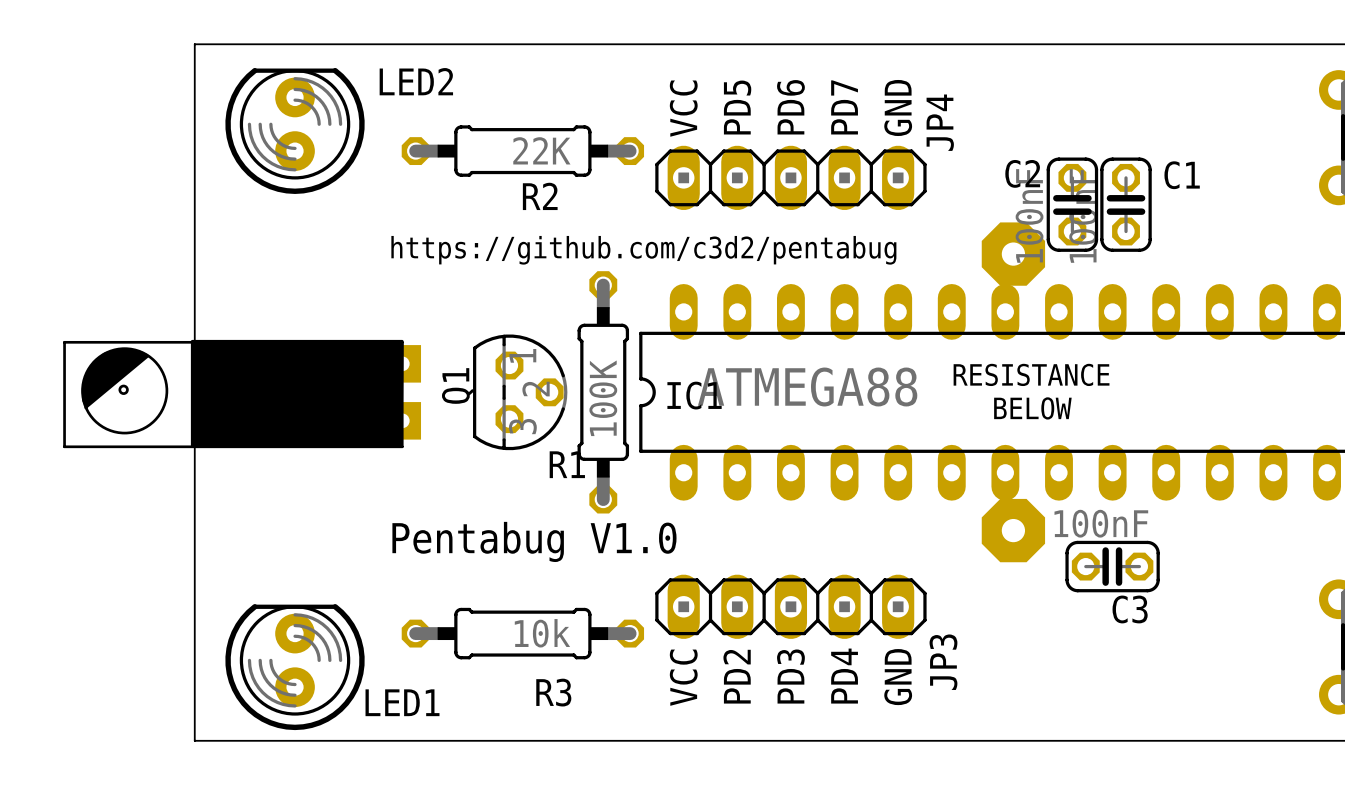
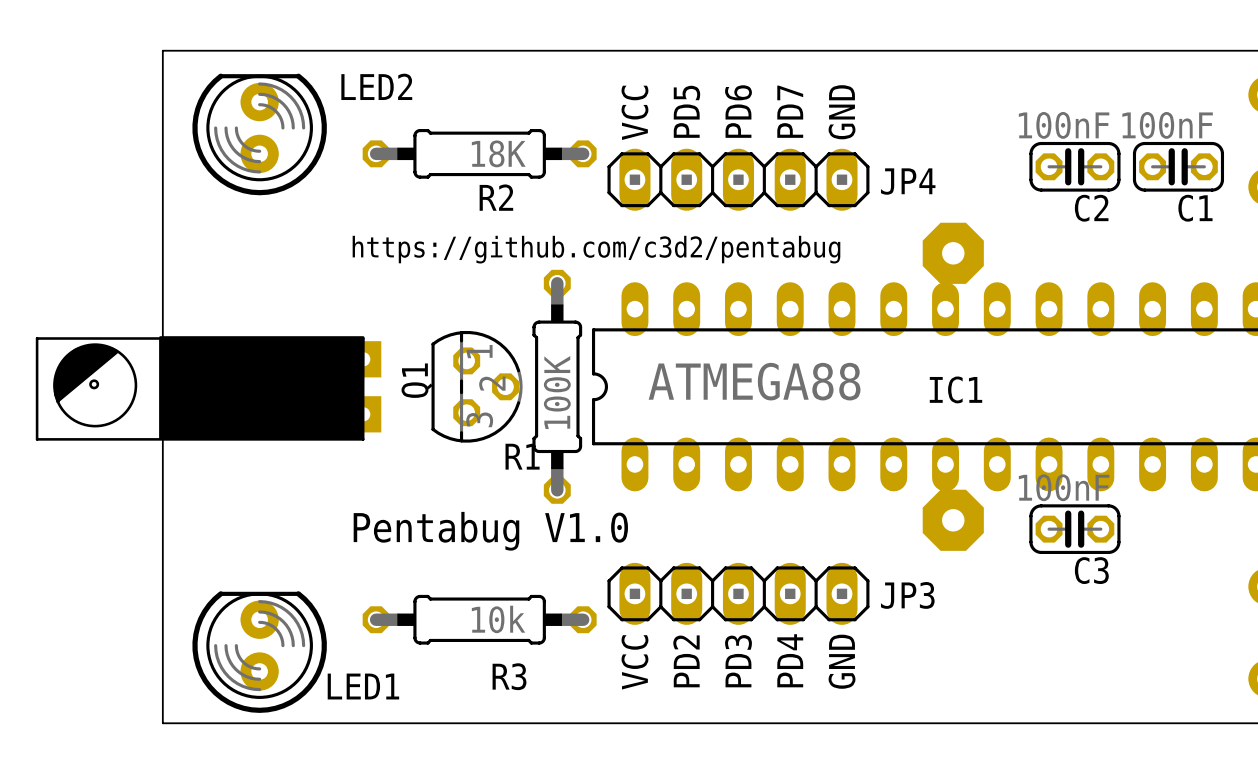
JP4 name rotation: 0° (940, 122) -> 90° clockwise (908, 181)
R2 value: 22K (541, 150) -> 18K (498, 153)
C2 name position: C2 (1022, 173) -> C2 (1091, 208)
C2 rotation: 0° (1072, 204) -> 90° clockwise (1074, 166)
C2 position: (1072, 204) -> (1074, 166)
C1 rotation: 0° (1126, 204) -> 90° clockwise (1178, 166)
C1 position: (1126, 204) -> (1178, 166)
text: RESISTANCE (1031, 374) -> none
IC1 name position: IC1 (694, 395) -> IC1 (955, 389)
text: BELOW (1032, 408) -> none
C3 position: (1112, 566) -> (1074, 529)
JP3 name rotation: 0° (943, 662) -> 90° clockwise (907, 595)

